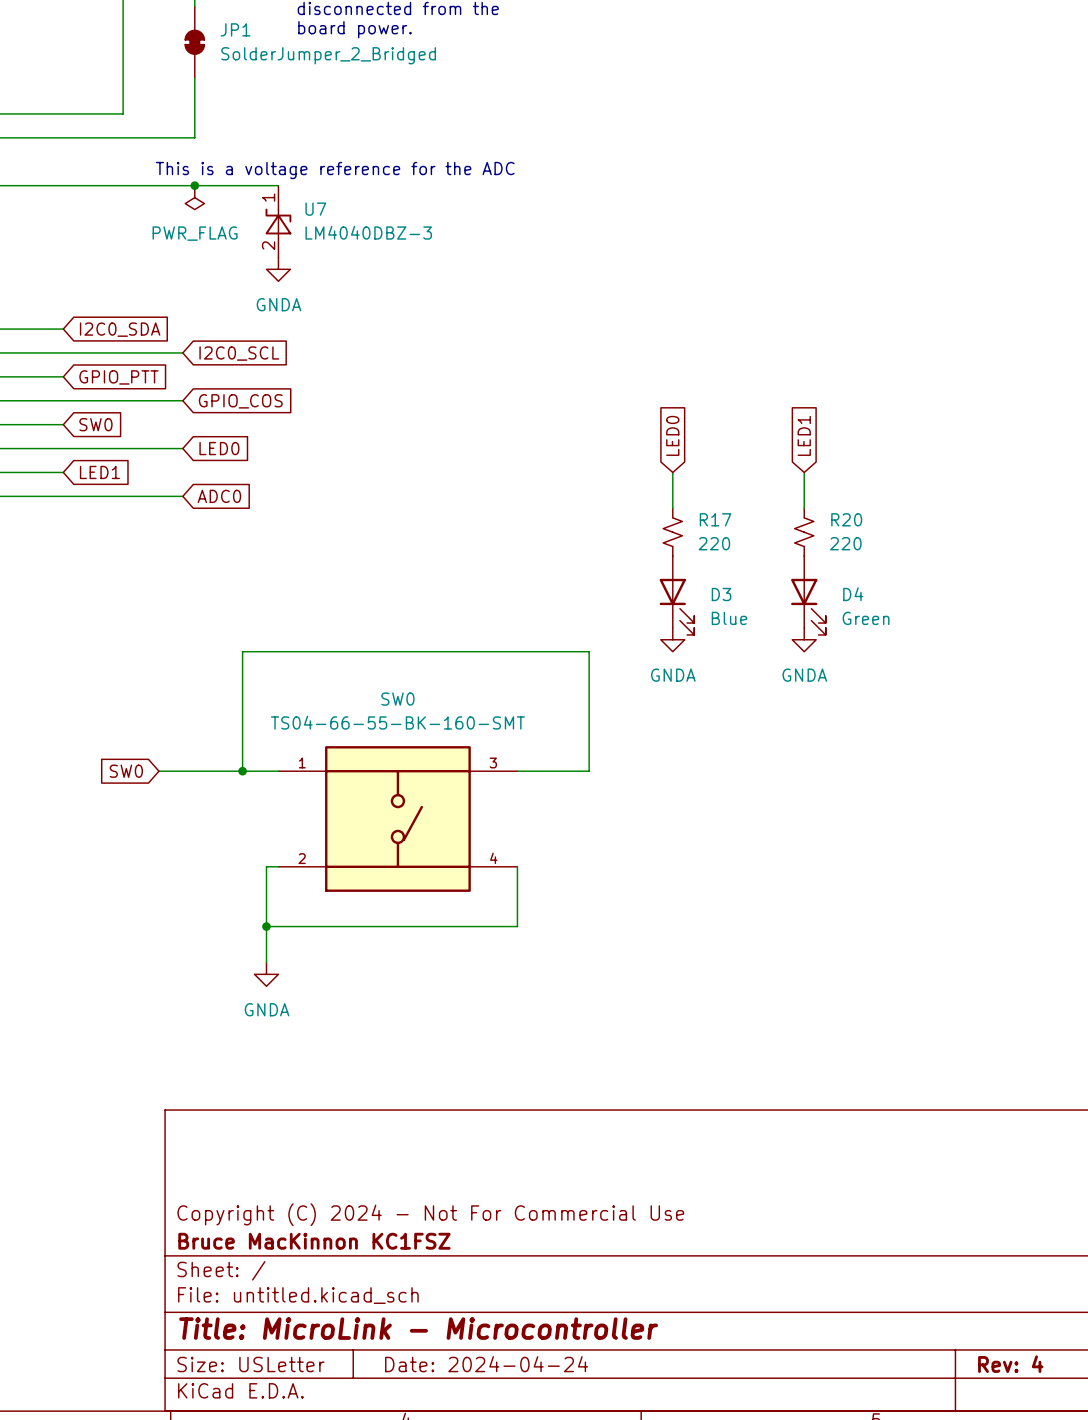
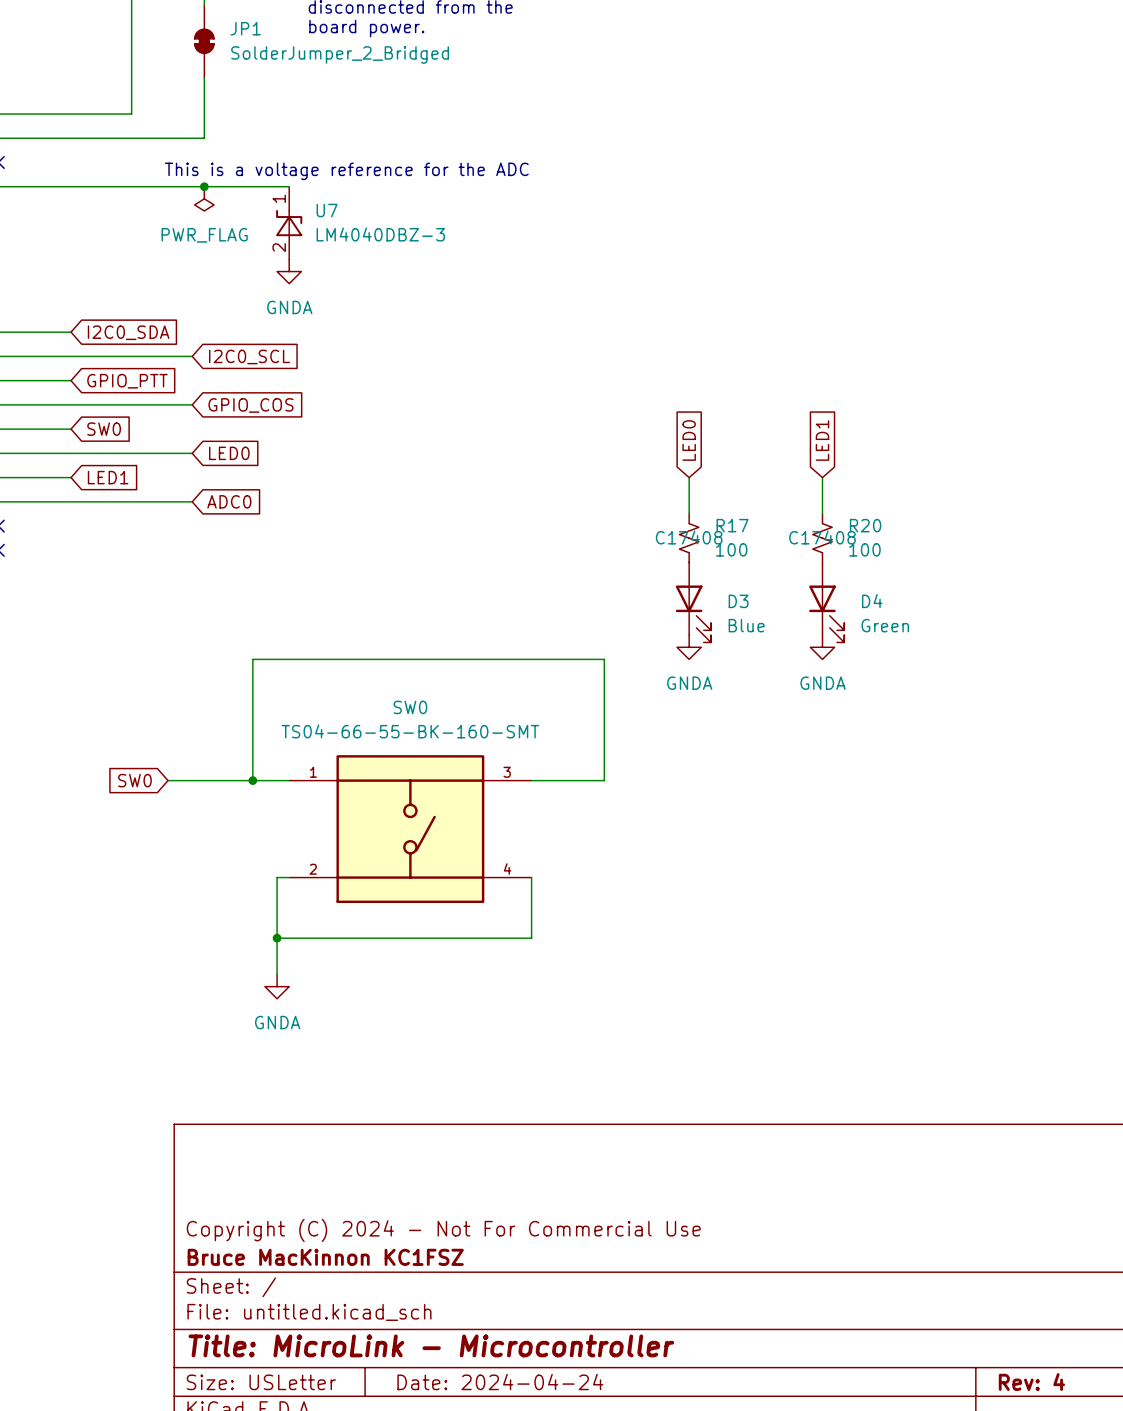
R17 text: none -> C17408 (689, 537)
R20 text: none -> C17408 (822, 537)
R17 value: 220 (714, 543) -> 100 (731, 549)
R20 value: 220 (845, 543) -> 100 (864, 549)

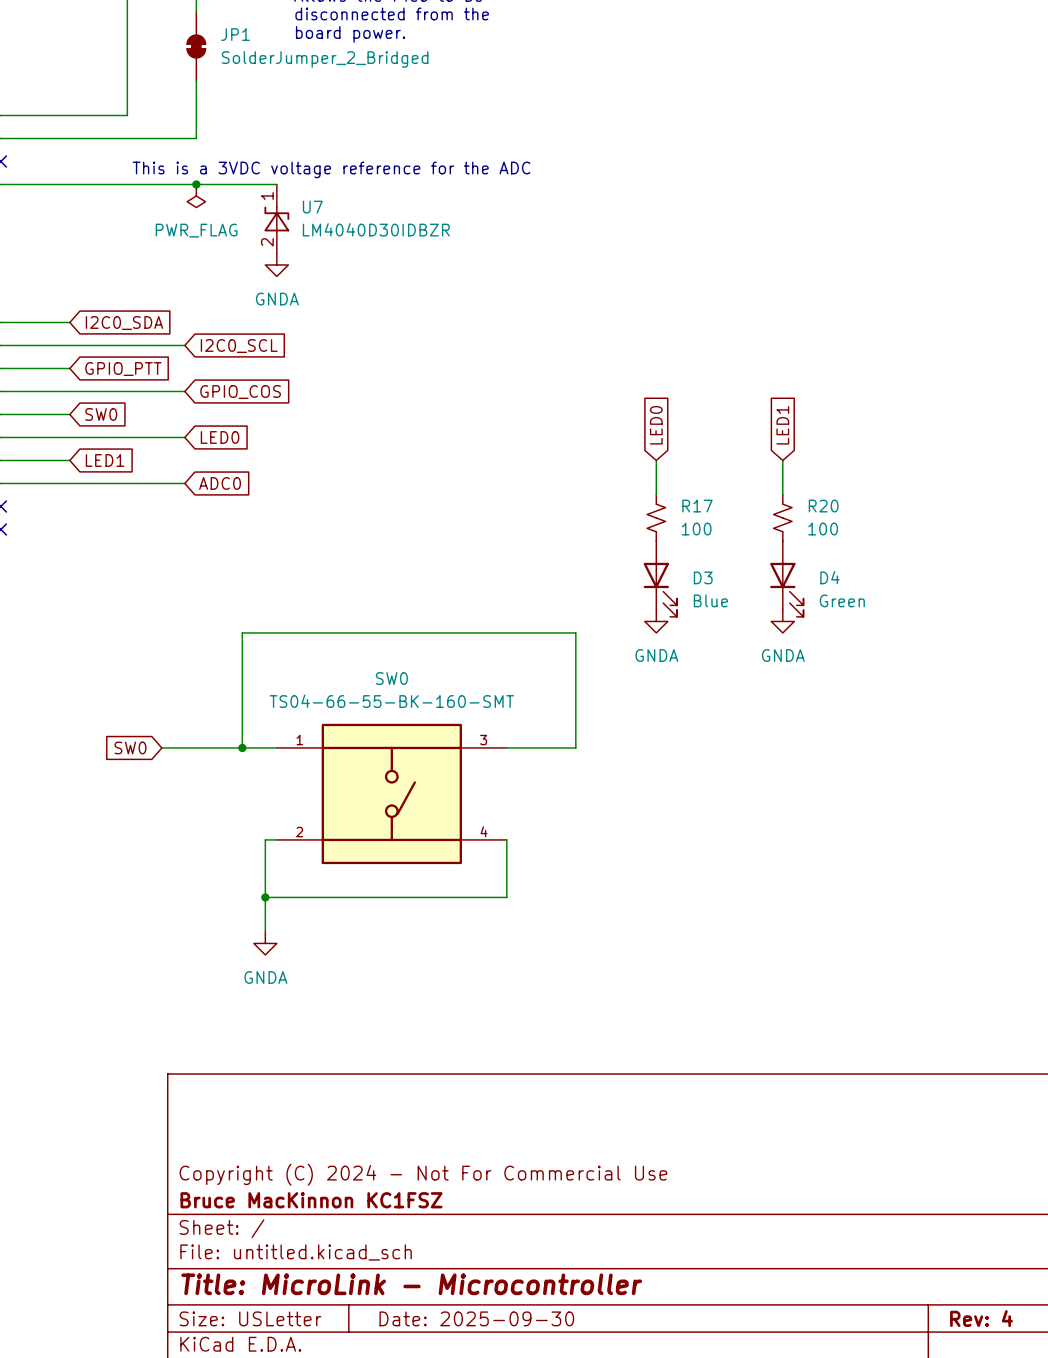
text: This is a voltage reference for the ADC (346, 171) -> This is a 3VDC voltage reference for the ADC (331, 169)
U7 value: LM4040DBZ-3 (380, 234) -> LM4040D30IDBZR (376, 229)
R17 text: C17408 (689, 537) -> none
R20 text: C17408 (822, 537) -> none
title block: Date: 2024-04-24 (500, 1382) -> Date: 2025-09-30 (476, 1318)

